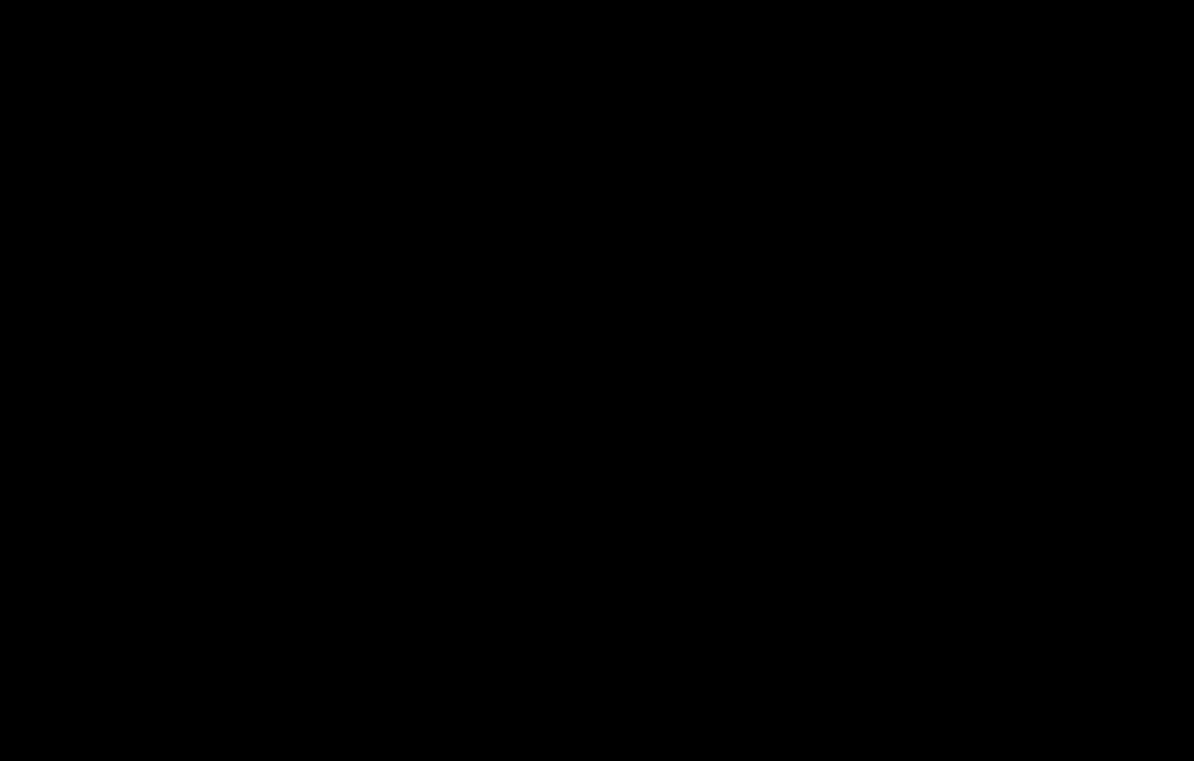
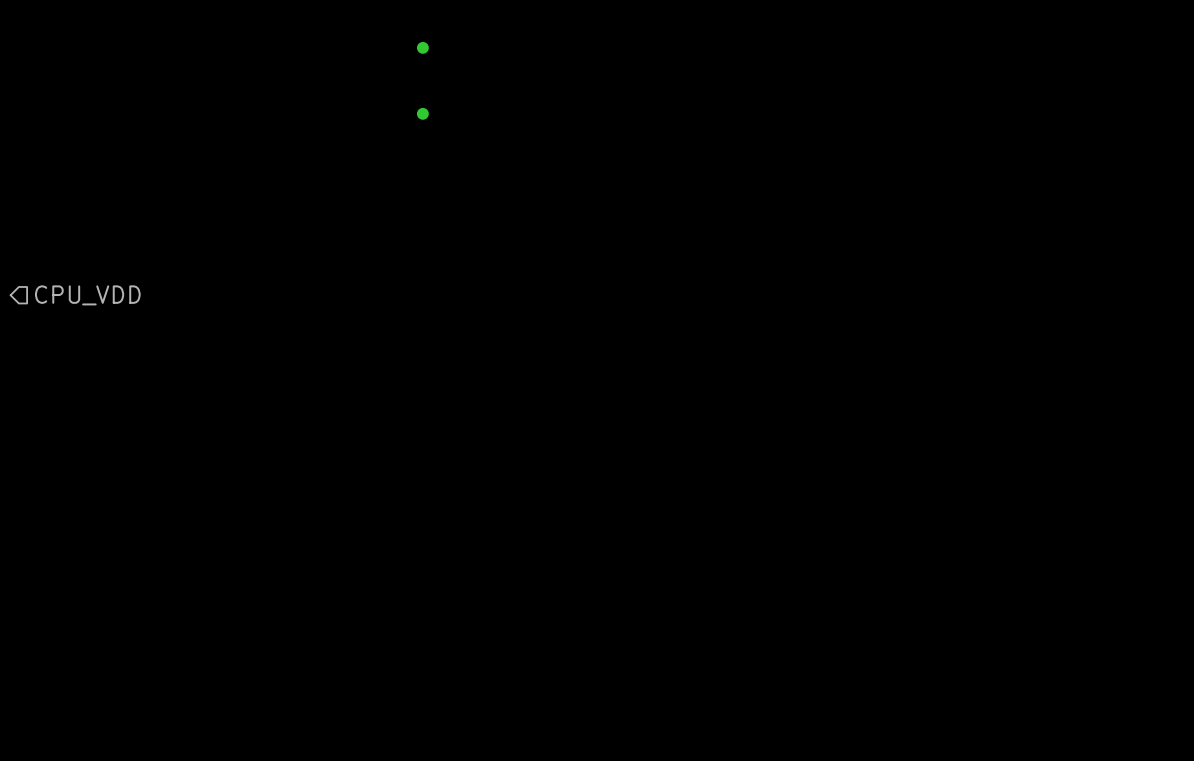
junction: none -> (422, 47)
junction: none -> (422, 113)
hierarchical label: none -> CPU_VDD (87, 295)

